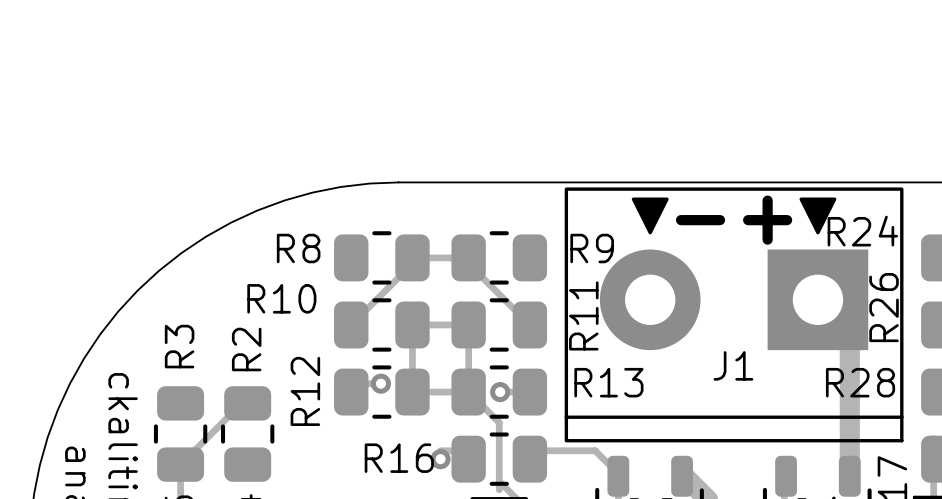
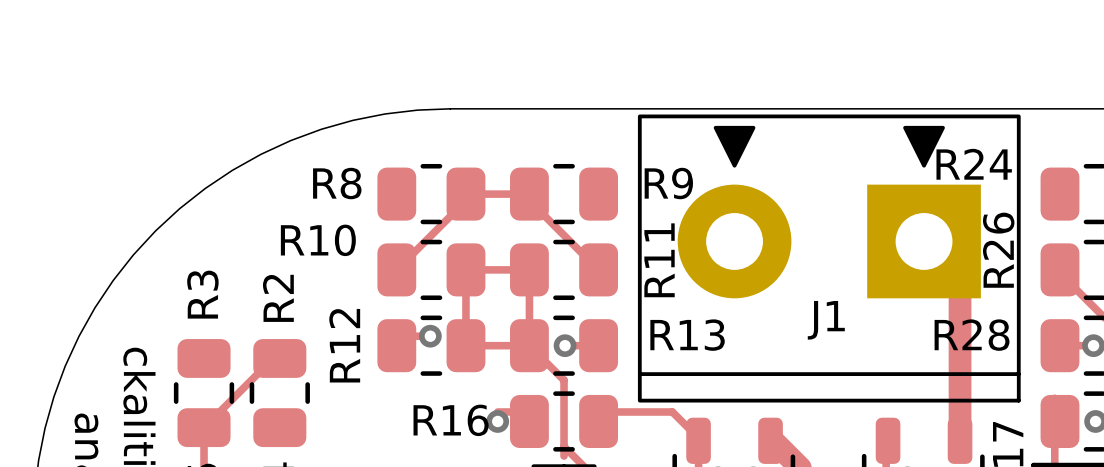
text: - (700, 220) -> none
text: + (767, 220) -> none

